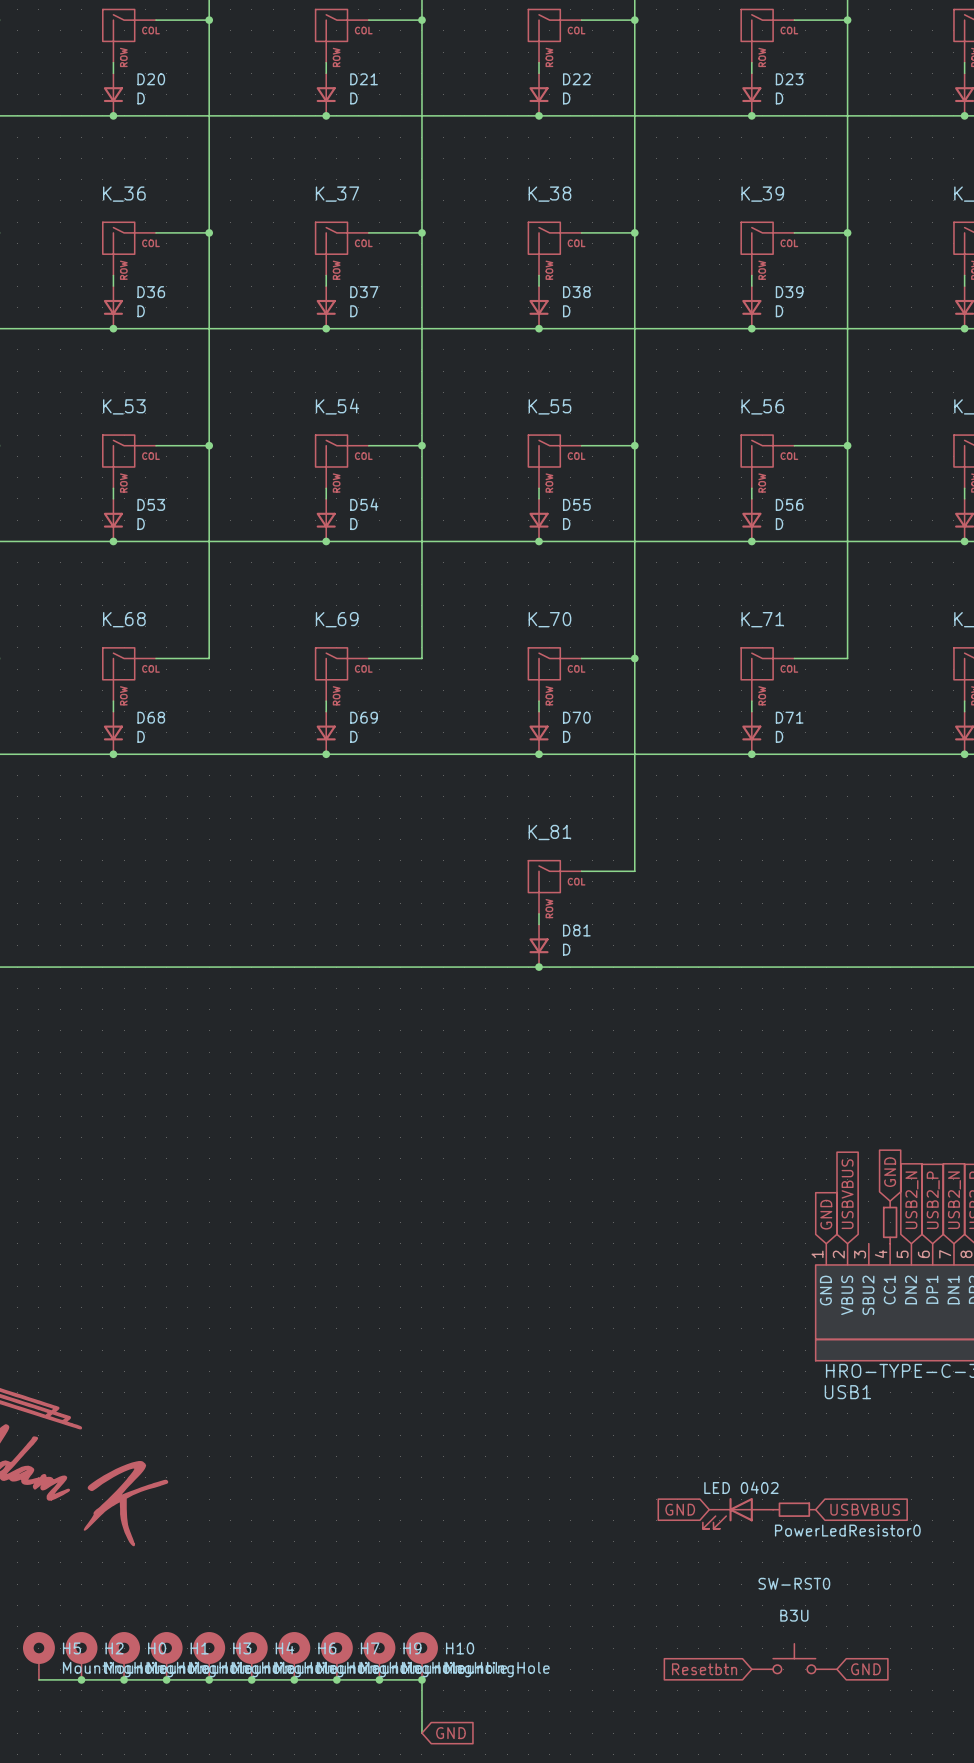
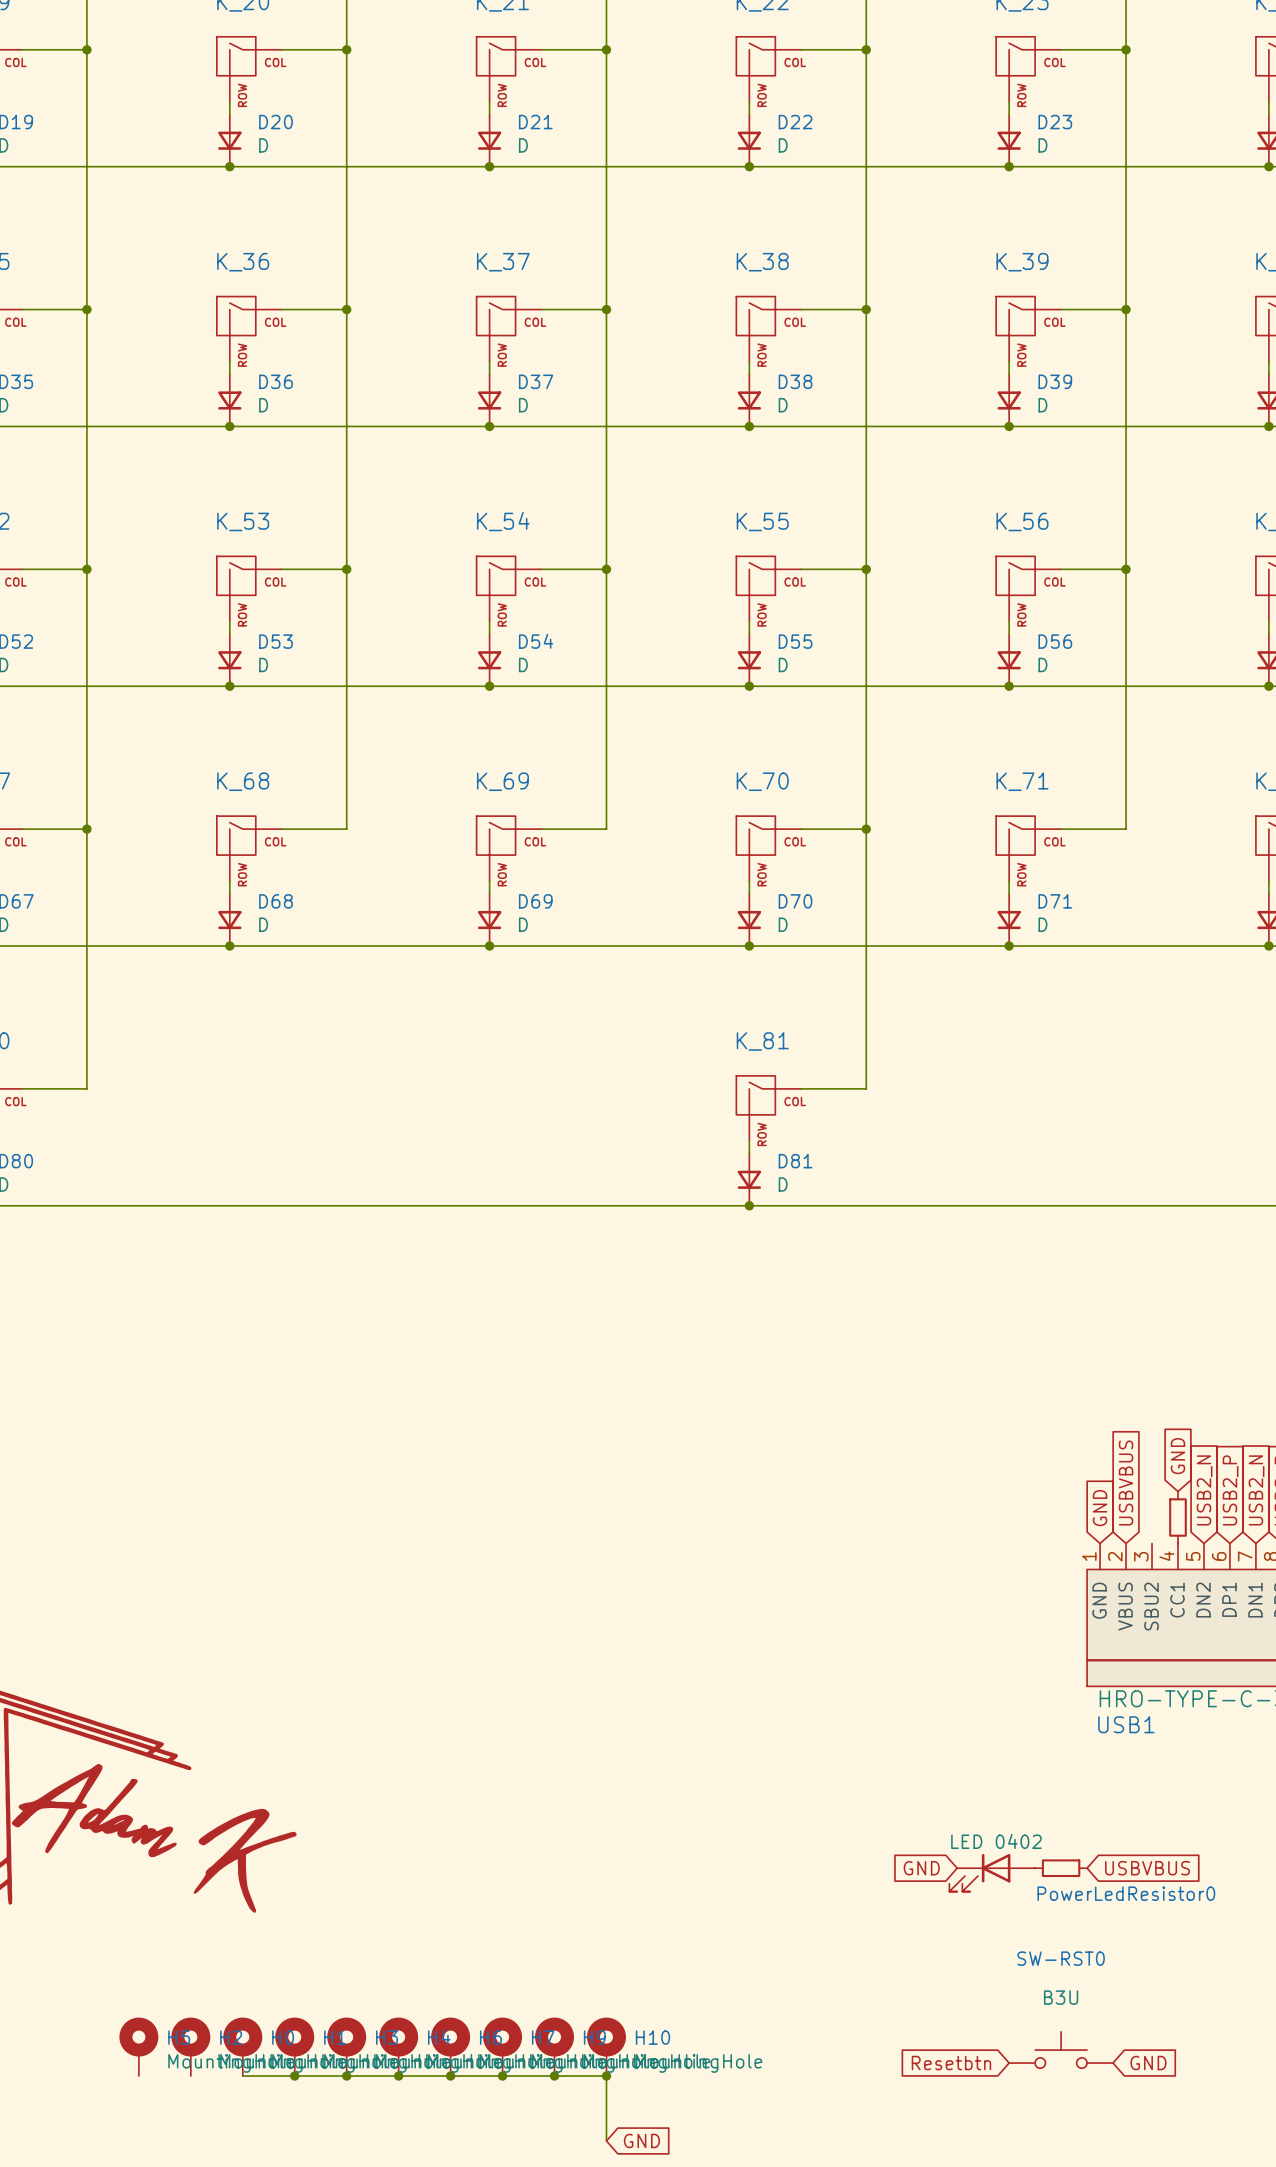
wire: (38, 1679) (124, 1679) -> none
junction: (81, 1679) -> none
junction: (124, 1679) -> none

